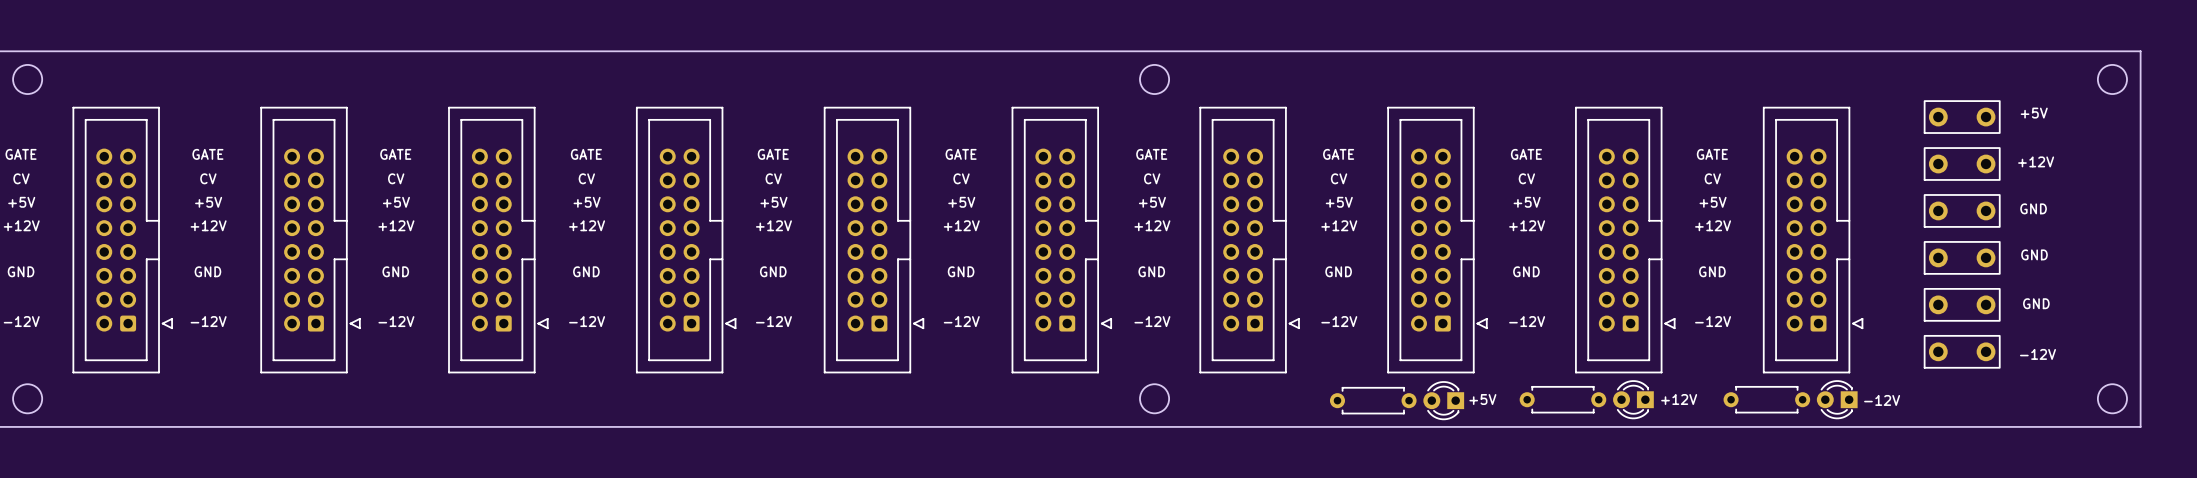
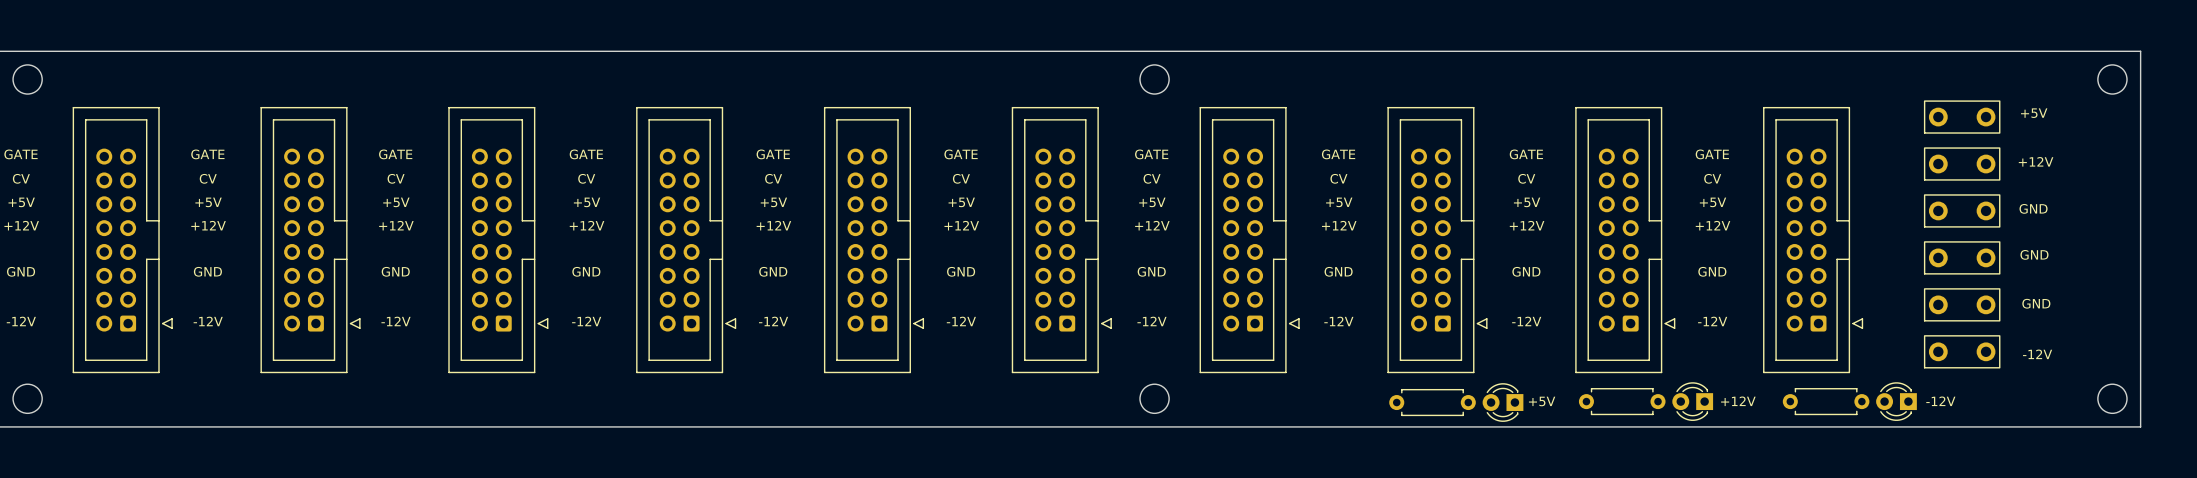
text position: +5V (1482, 399) -> +5V (1542, 401)
part position: (1562, 399) -> (1622, 401)
part position: (1633, 399) -> (1692, 401)
text position: +12V (1679, 399) -> +12V (1738, 401)
part position: (1766, 399) -> (1826, 401)
part position: (1837, 399) -> (1896, 401)
part position: (1373, 400) -> (1432, 402)
part position: (1443, 400) -> (1503, 402)
text position: -12V (1882, 400) -> -12V (1940, 401)

